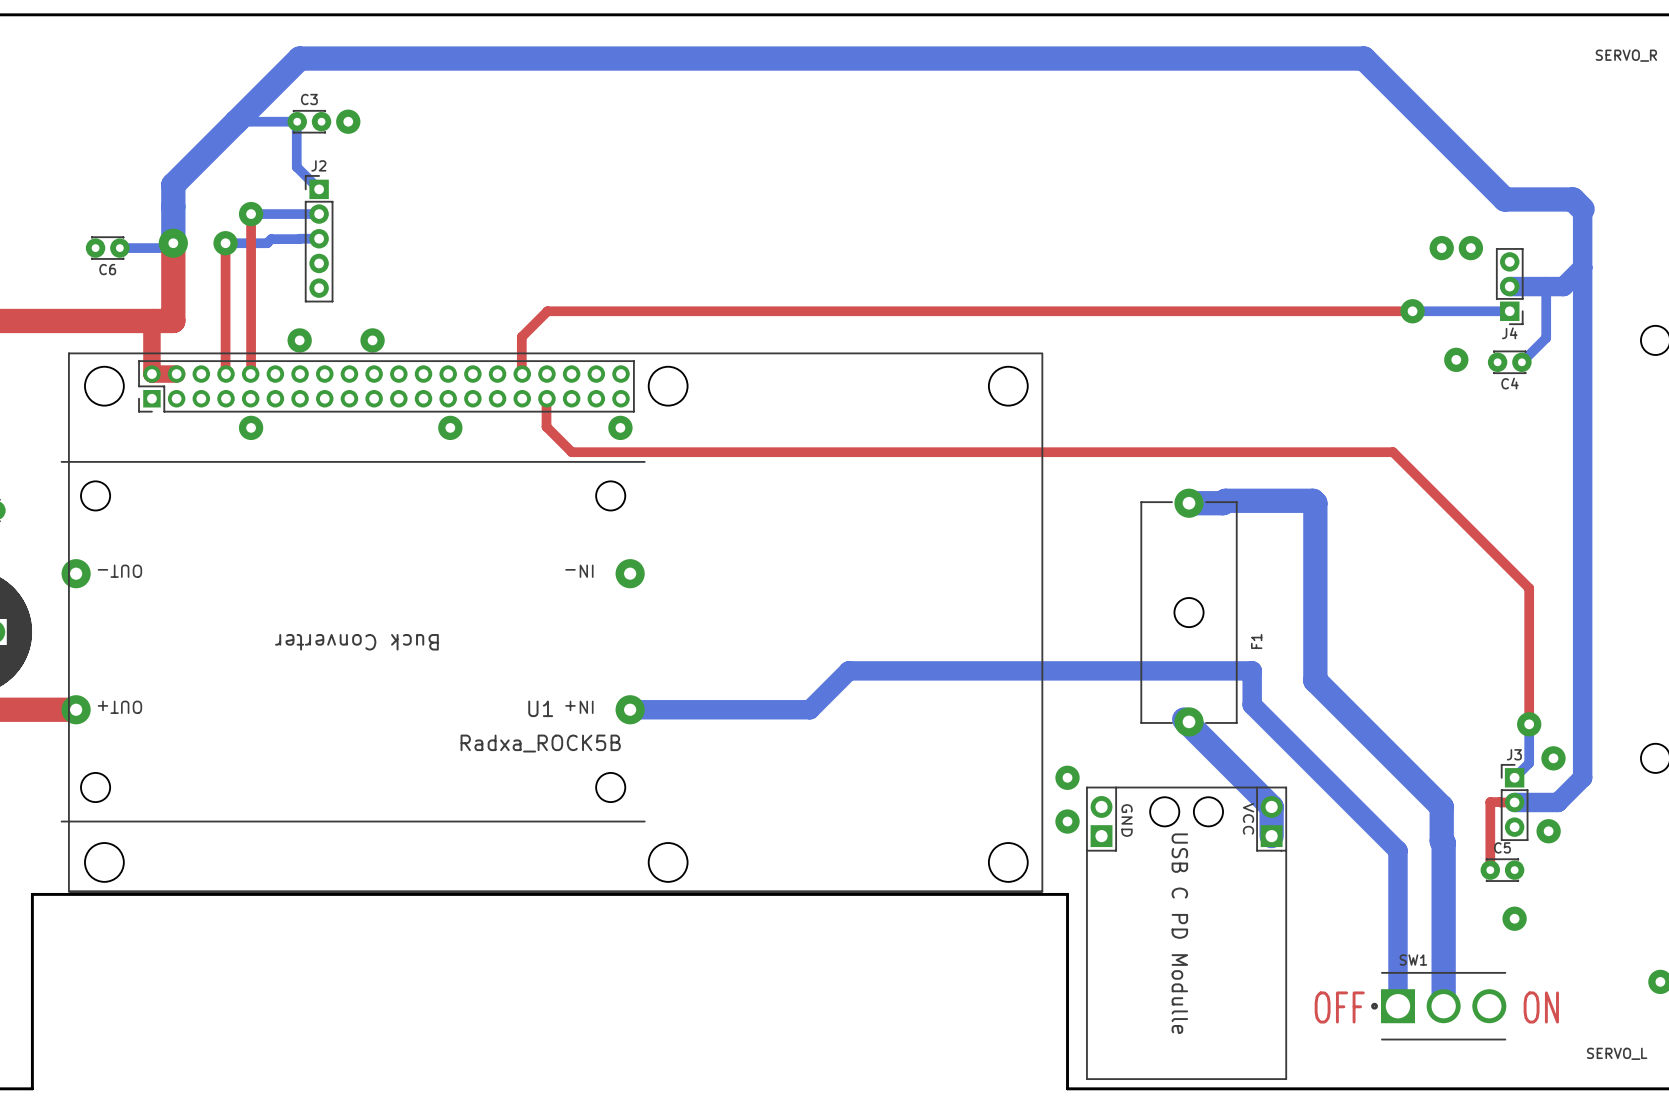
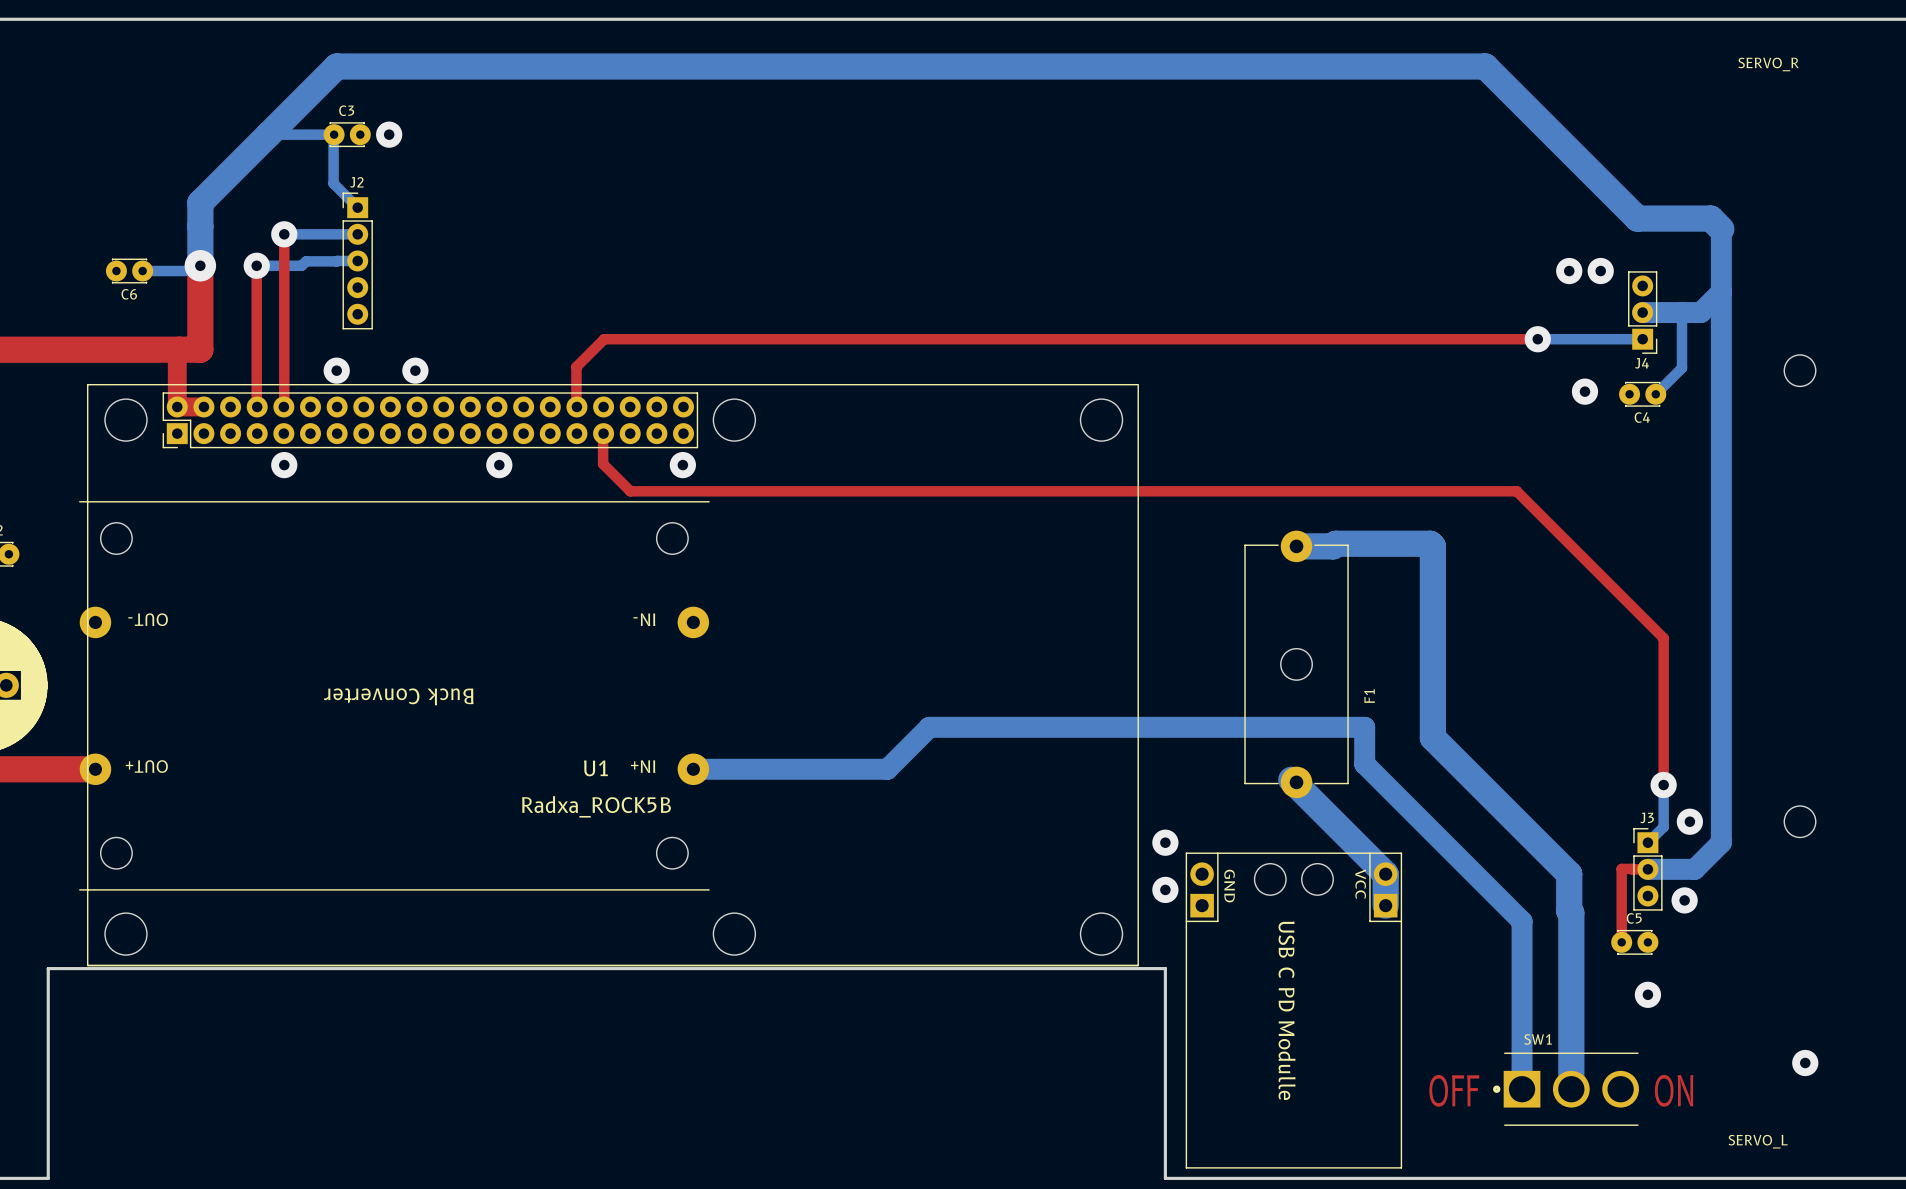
U1 footprint: [68, 352, 1043, 893] -> [87, 384, 1139, 967]

